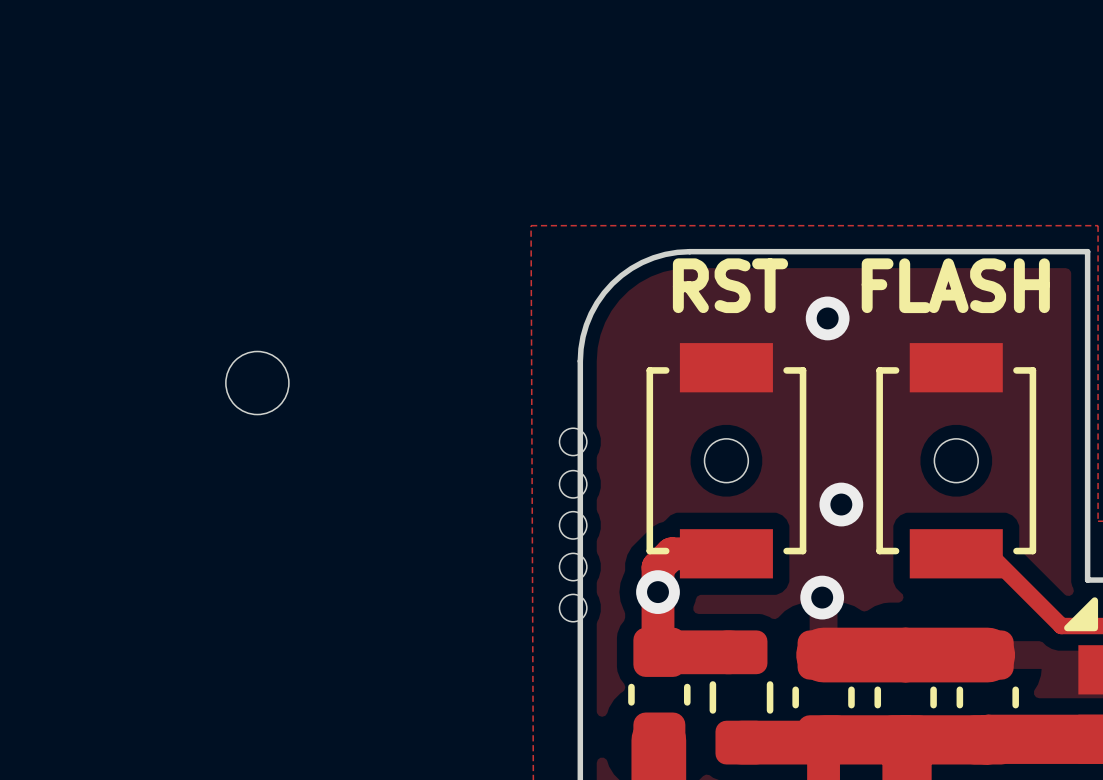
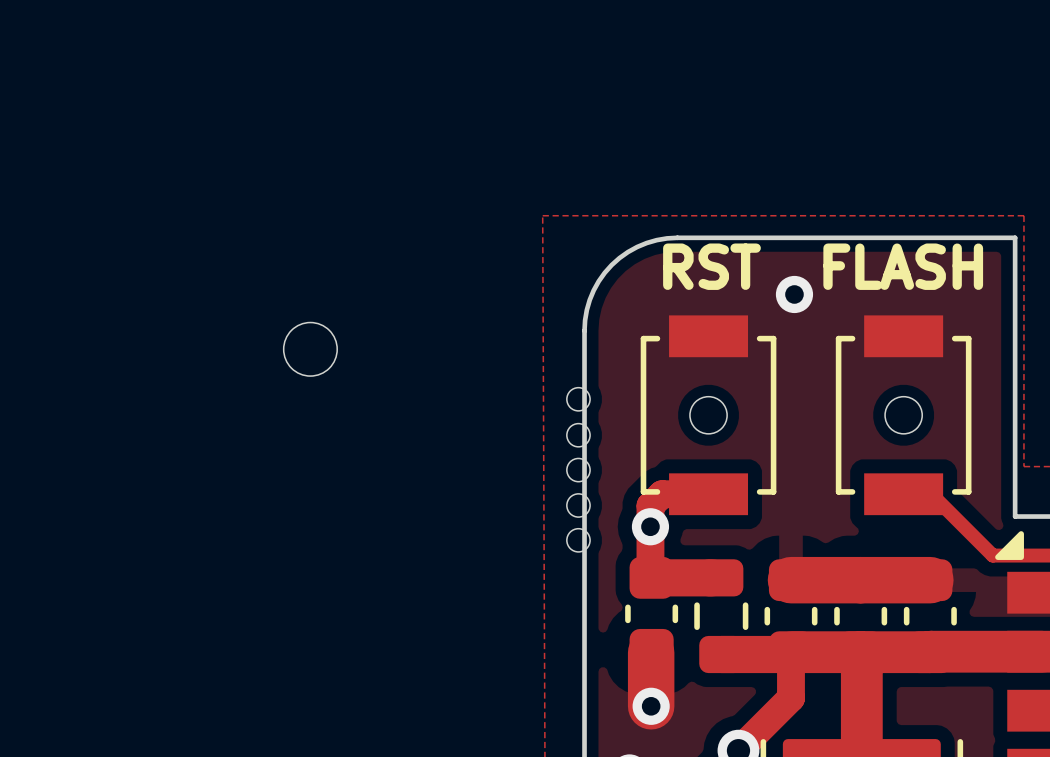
via: (841, 504) -> none
via: (822, 597) -> none

